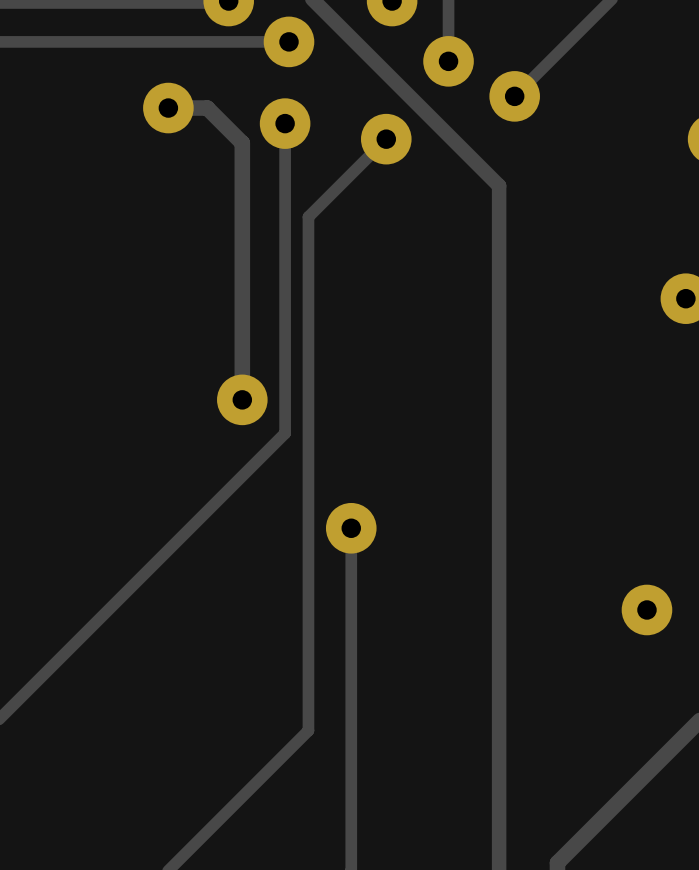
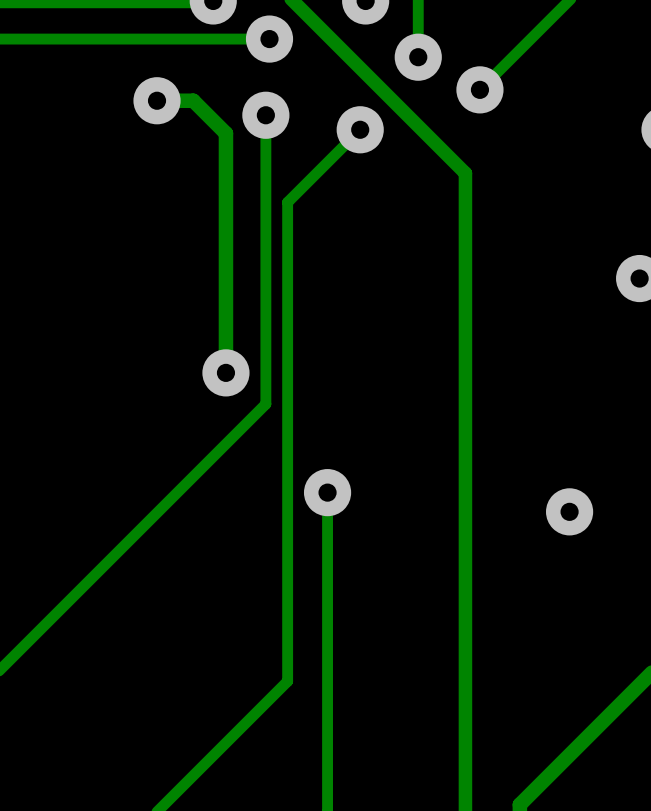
via position: (646, 609) -> (569, 511)

